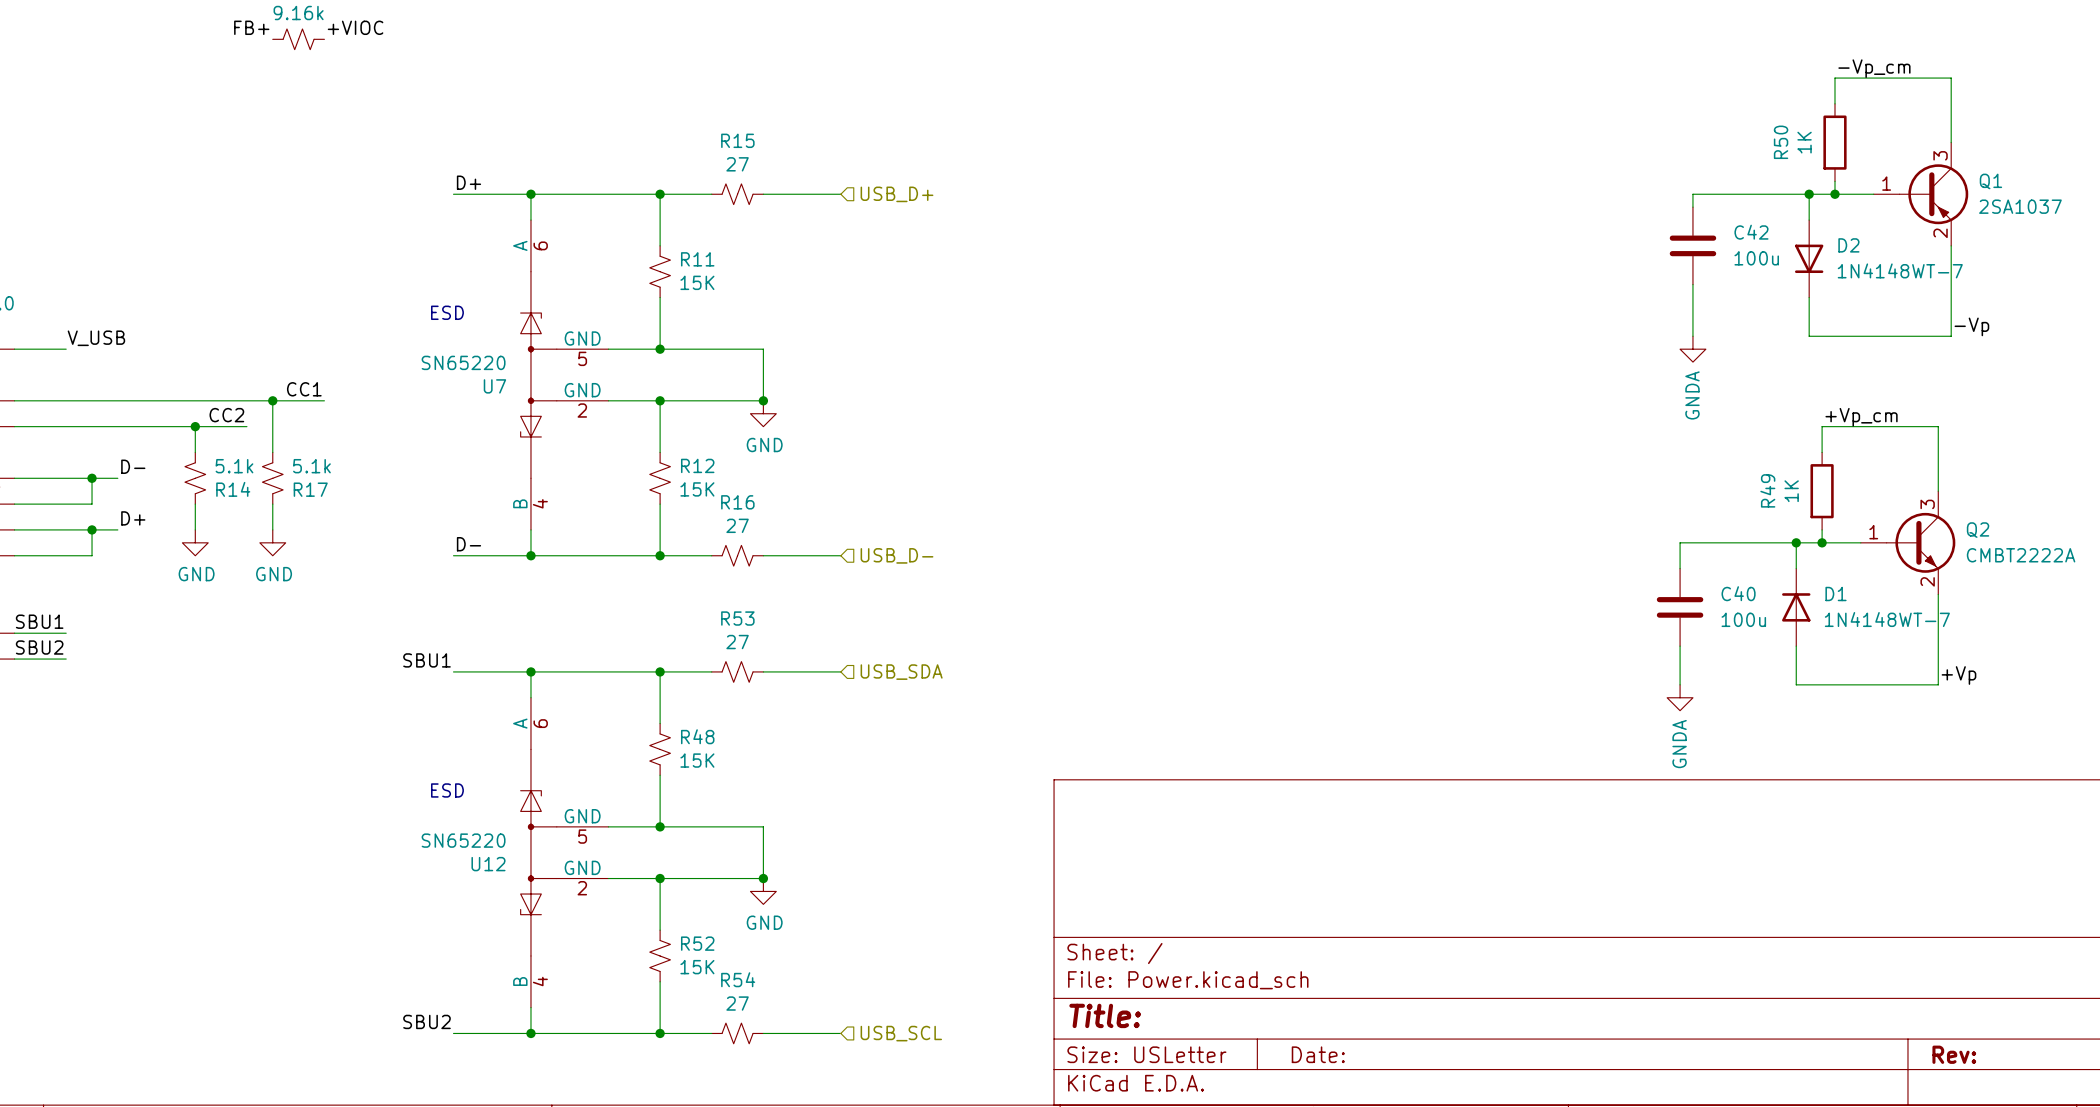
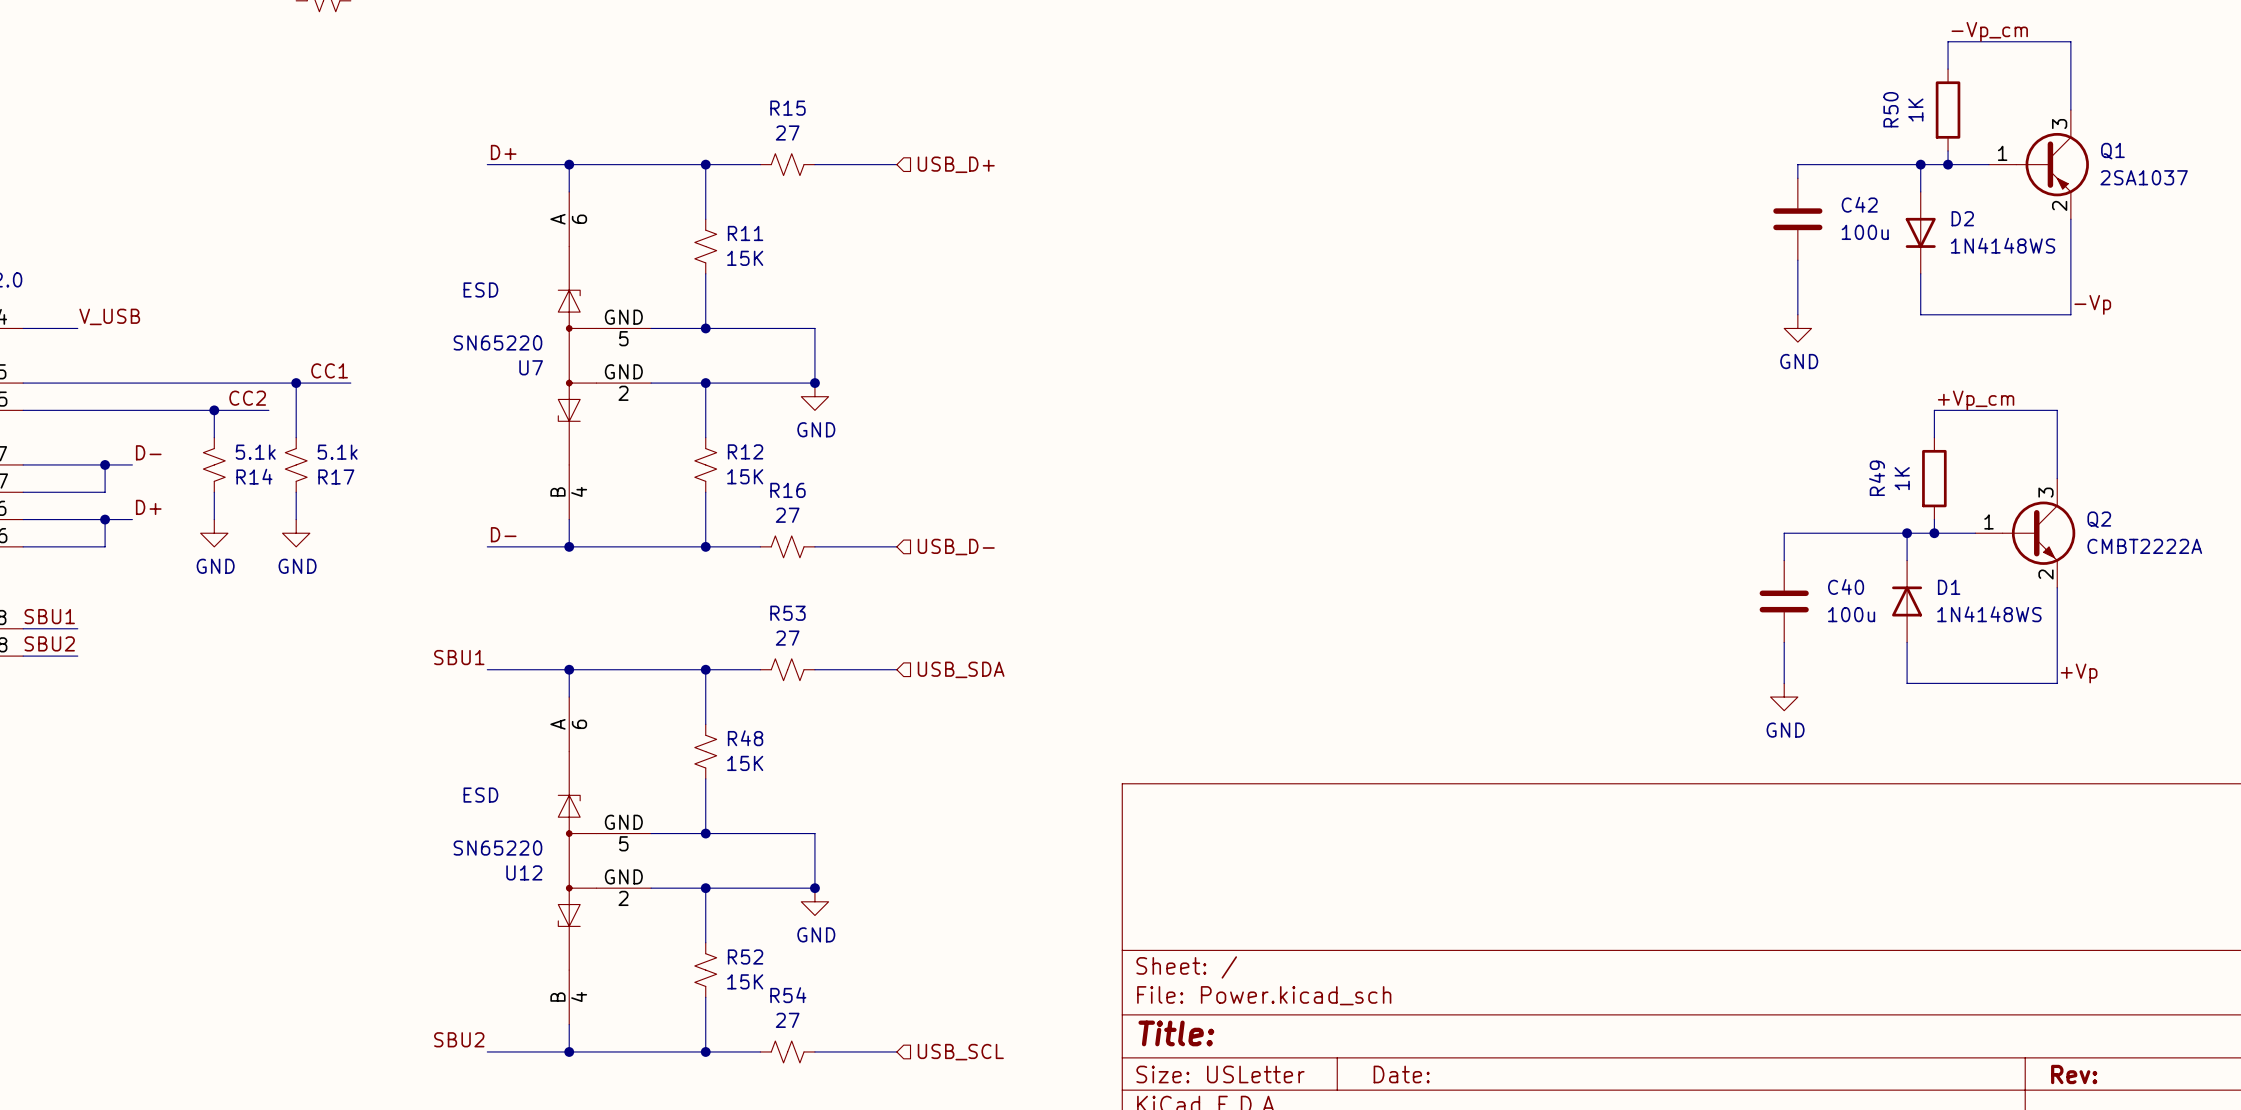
D2 value: 1N4148WT-7 (1900, 270) -> 1N4148WS (2003, 245)
power symbol: GNDA (1692, 349) -> GND (1797, 328)
D1 value: 1N4148WT-7 (1887, 619) -> 1N4148WS (1989, 614)
power symbol: GNDA (1680, 697) -> GND (1784, 697)

